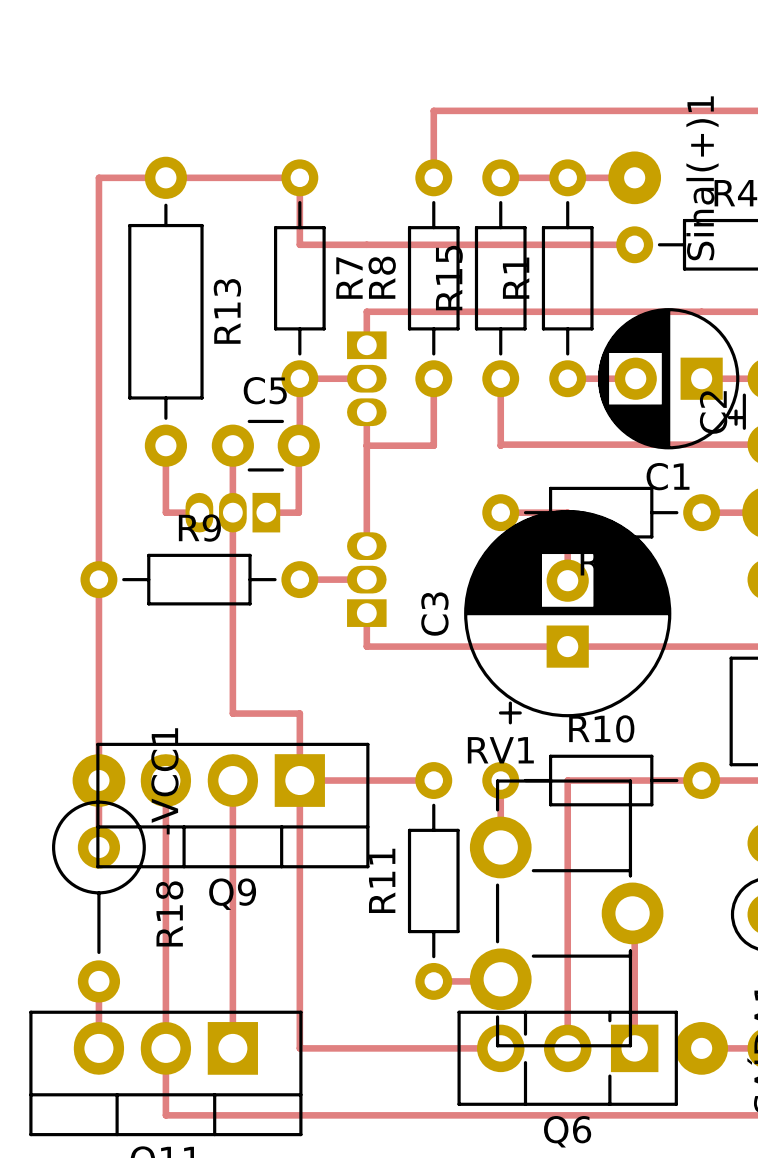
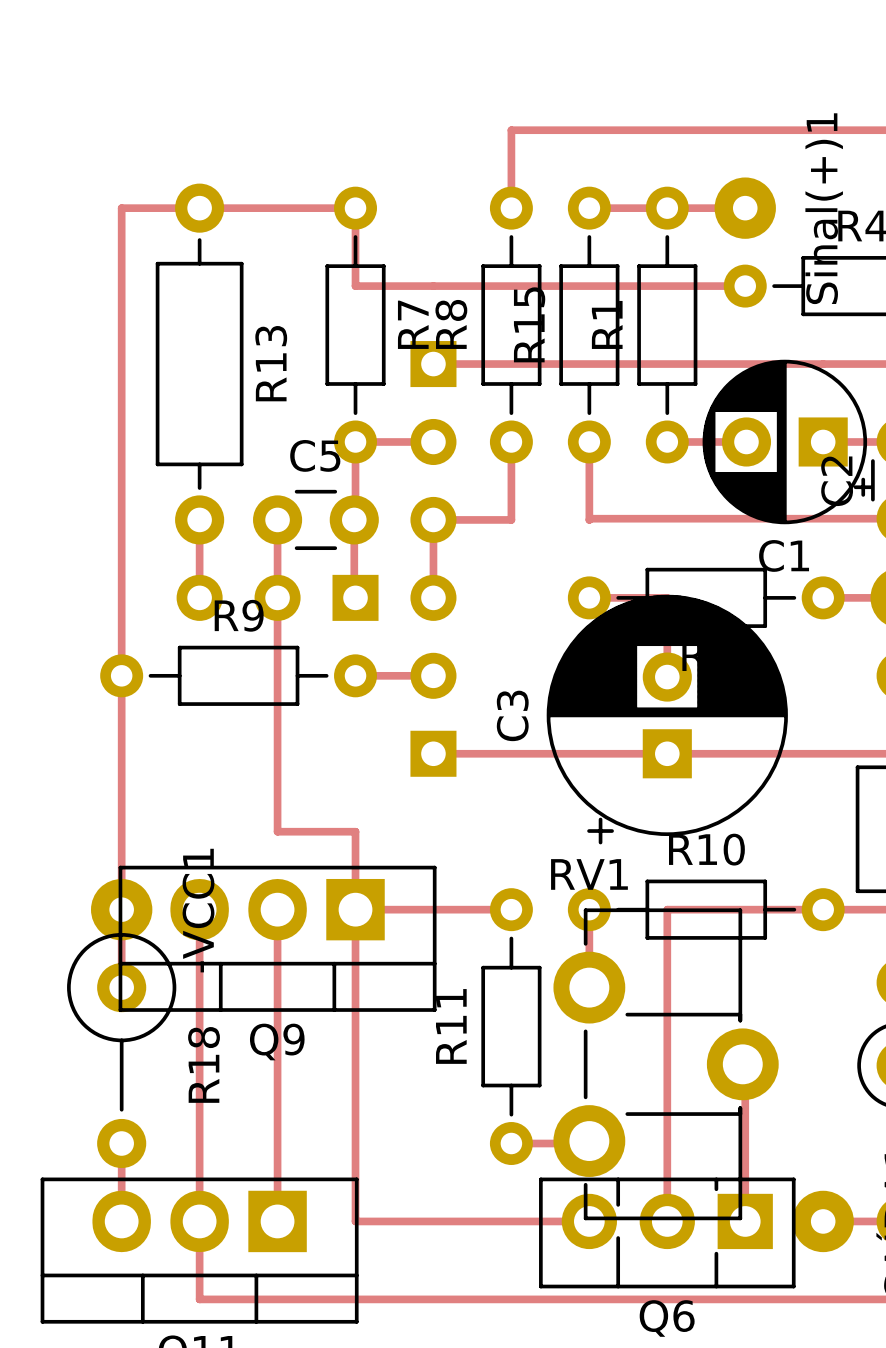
track: (366, 311) (366, 345) -> none
part footprint: [347, 331, 387, 427] -> [410, 341, 457, 543]
track: (366, 412) (366, 445) -> none
part footprint: [185, 492, 281, 533] -> [176, 574, 379, 621]
track: (165, 512) (199, 512) -> none
track: (266, 512) (298, 512) -> none
track: (366, 512) (366, 546) -> none
part footprint: [347, 532, 387, 627] -> [410, 574, 457, 777]
track: (366, 613) (366, 646) -> none

